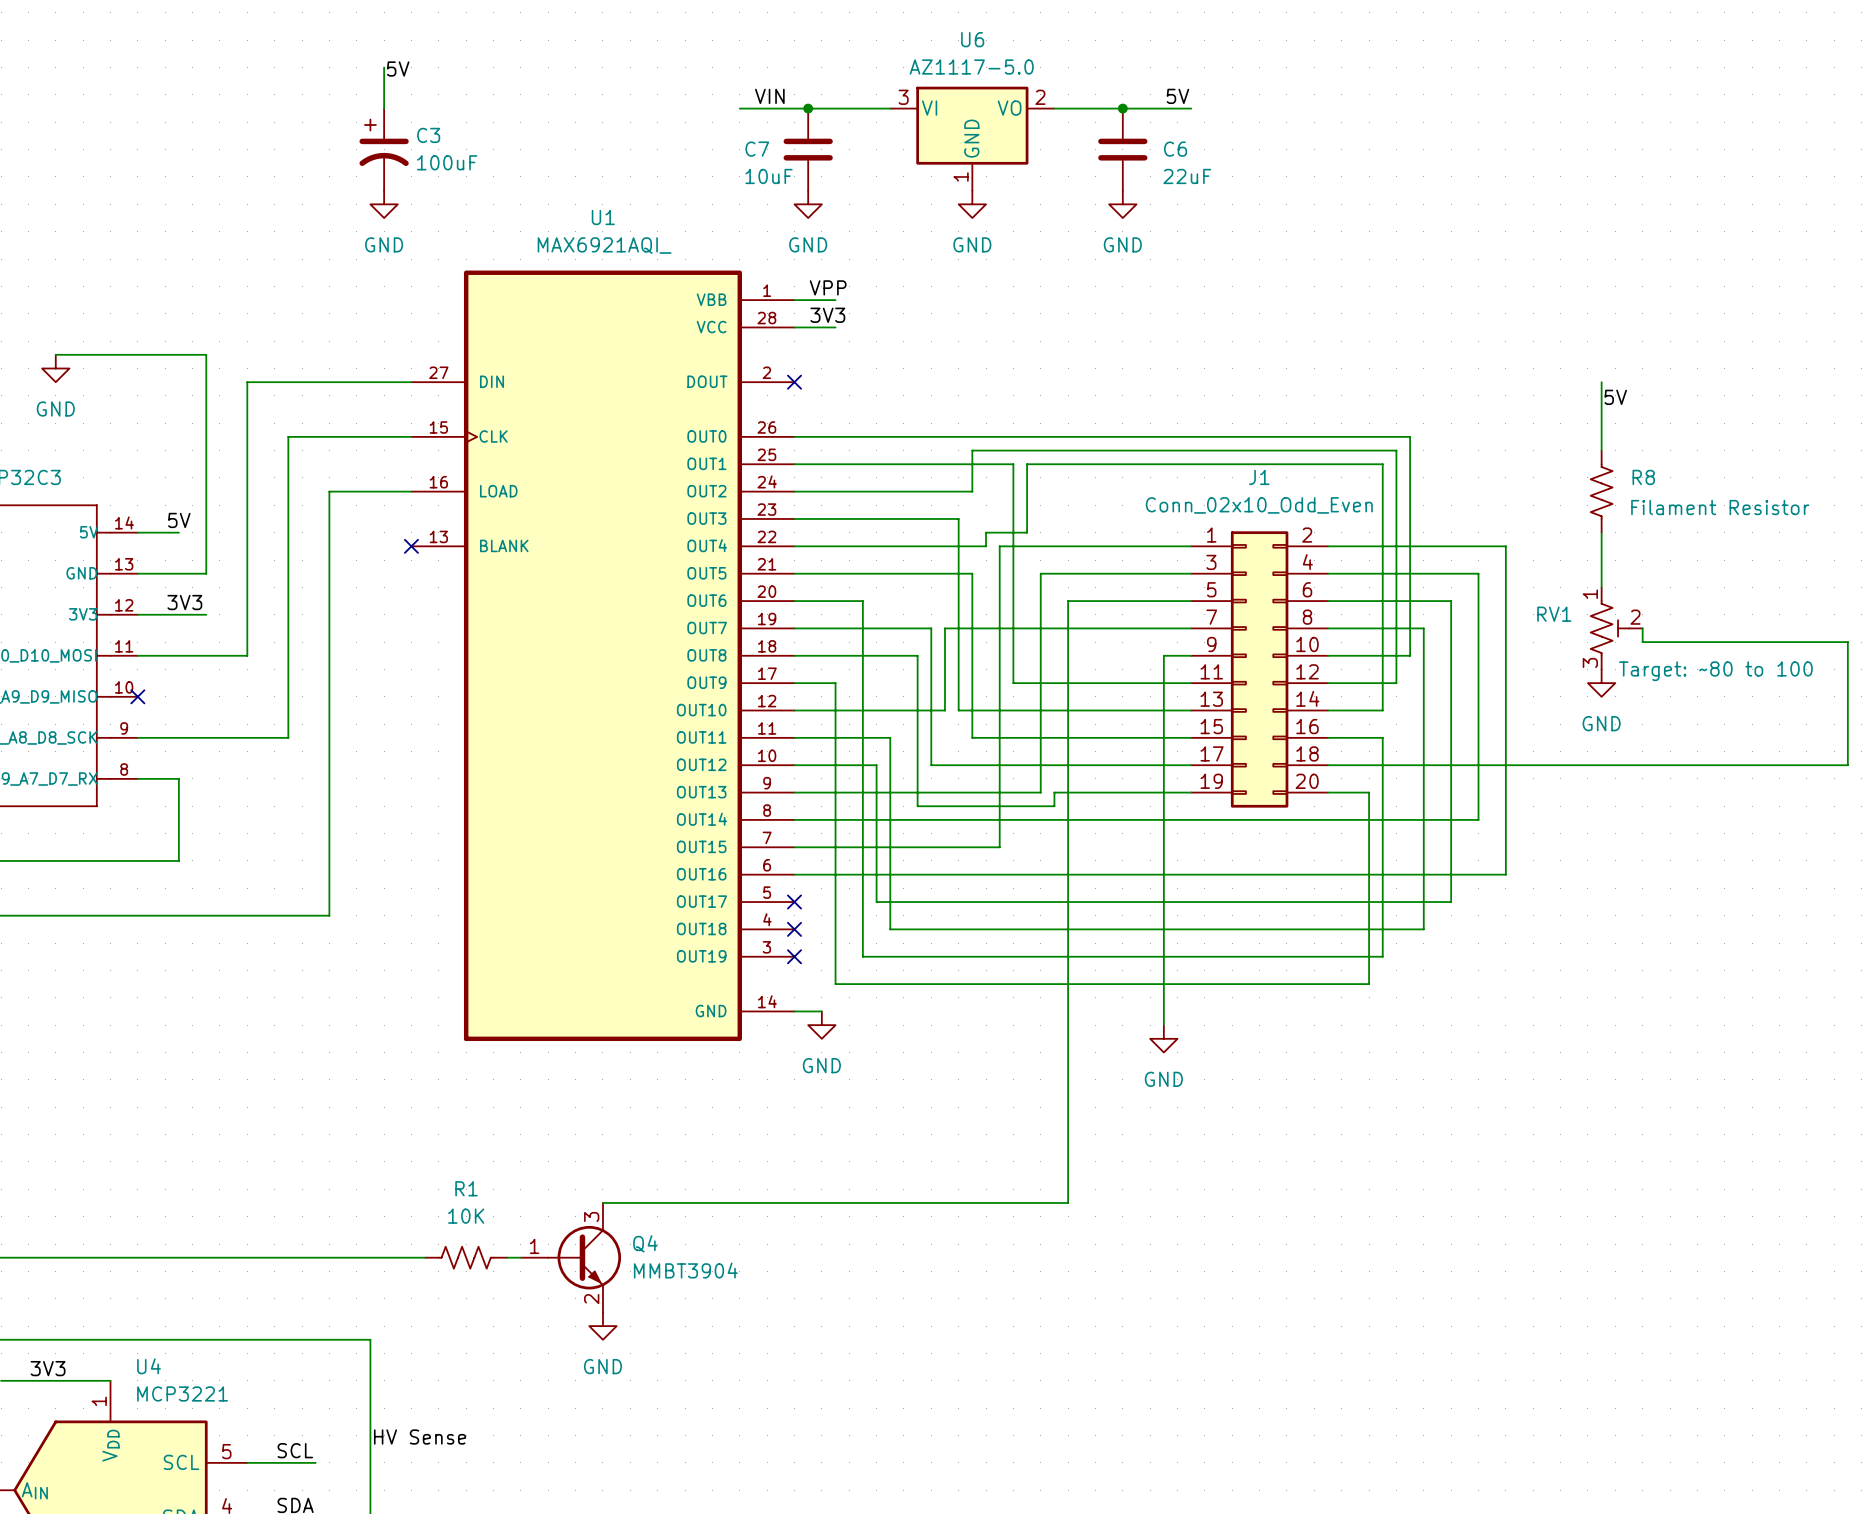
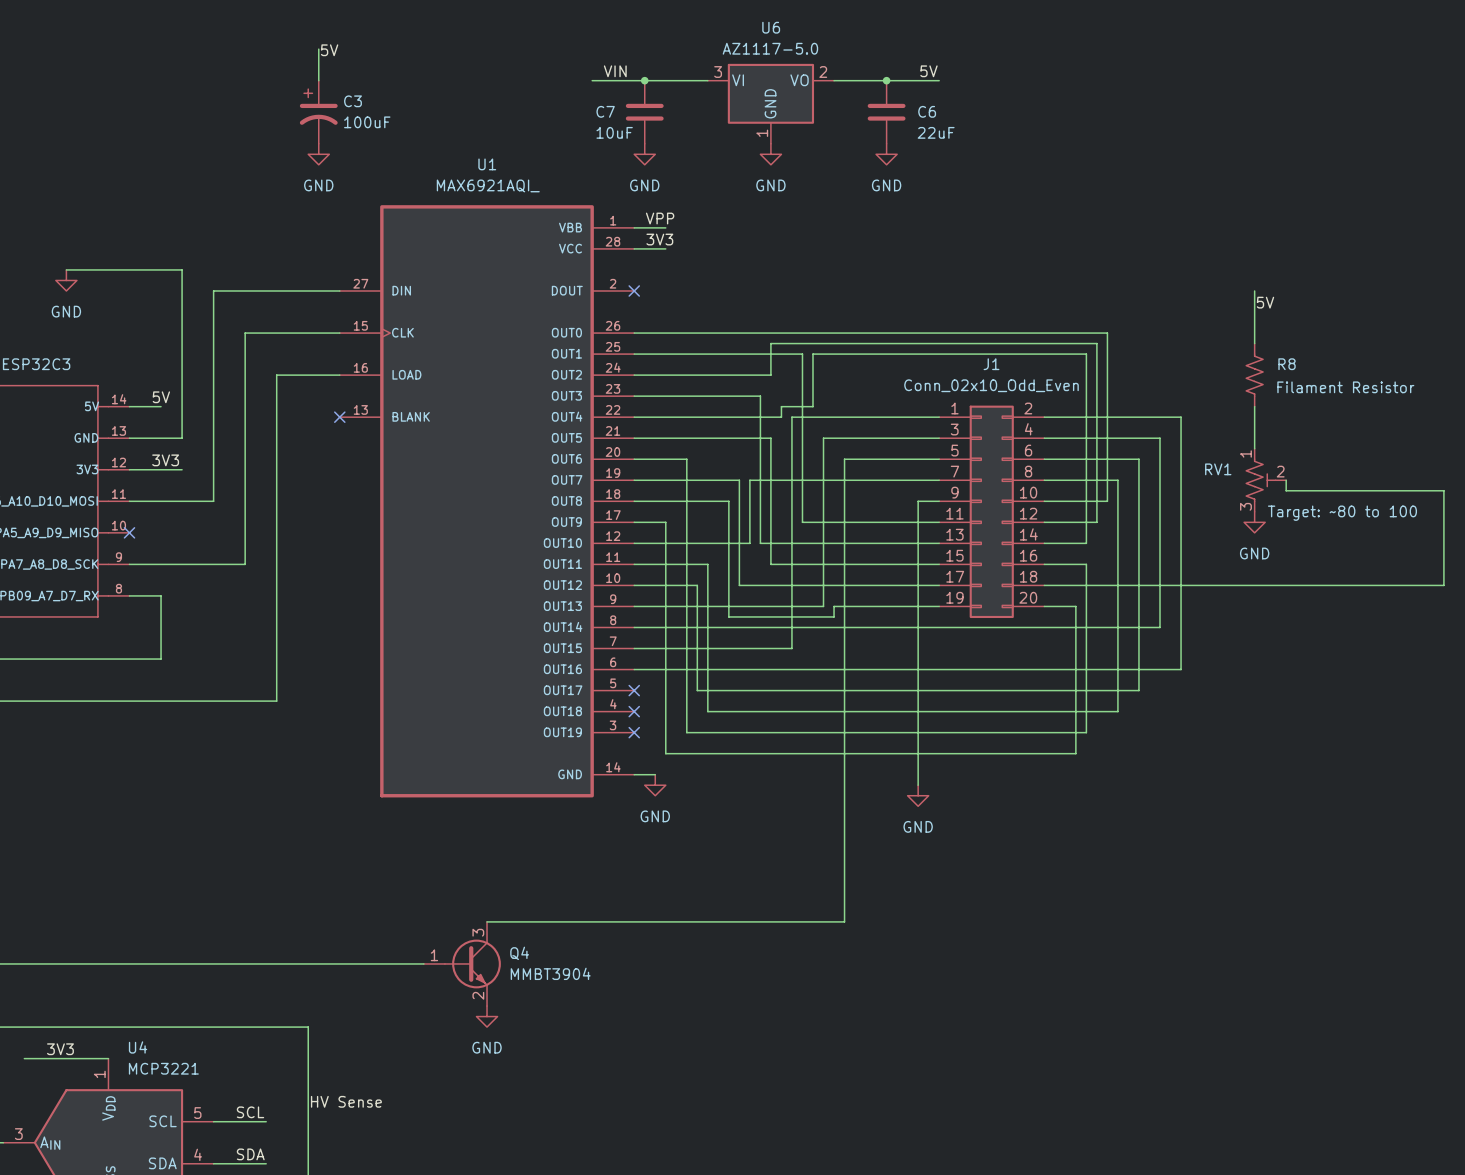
R1: 10K (466, 1257) -> none

